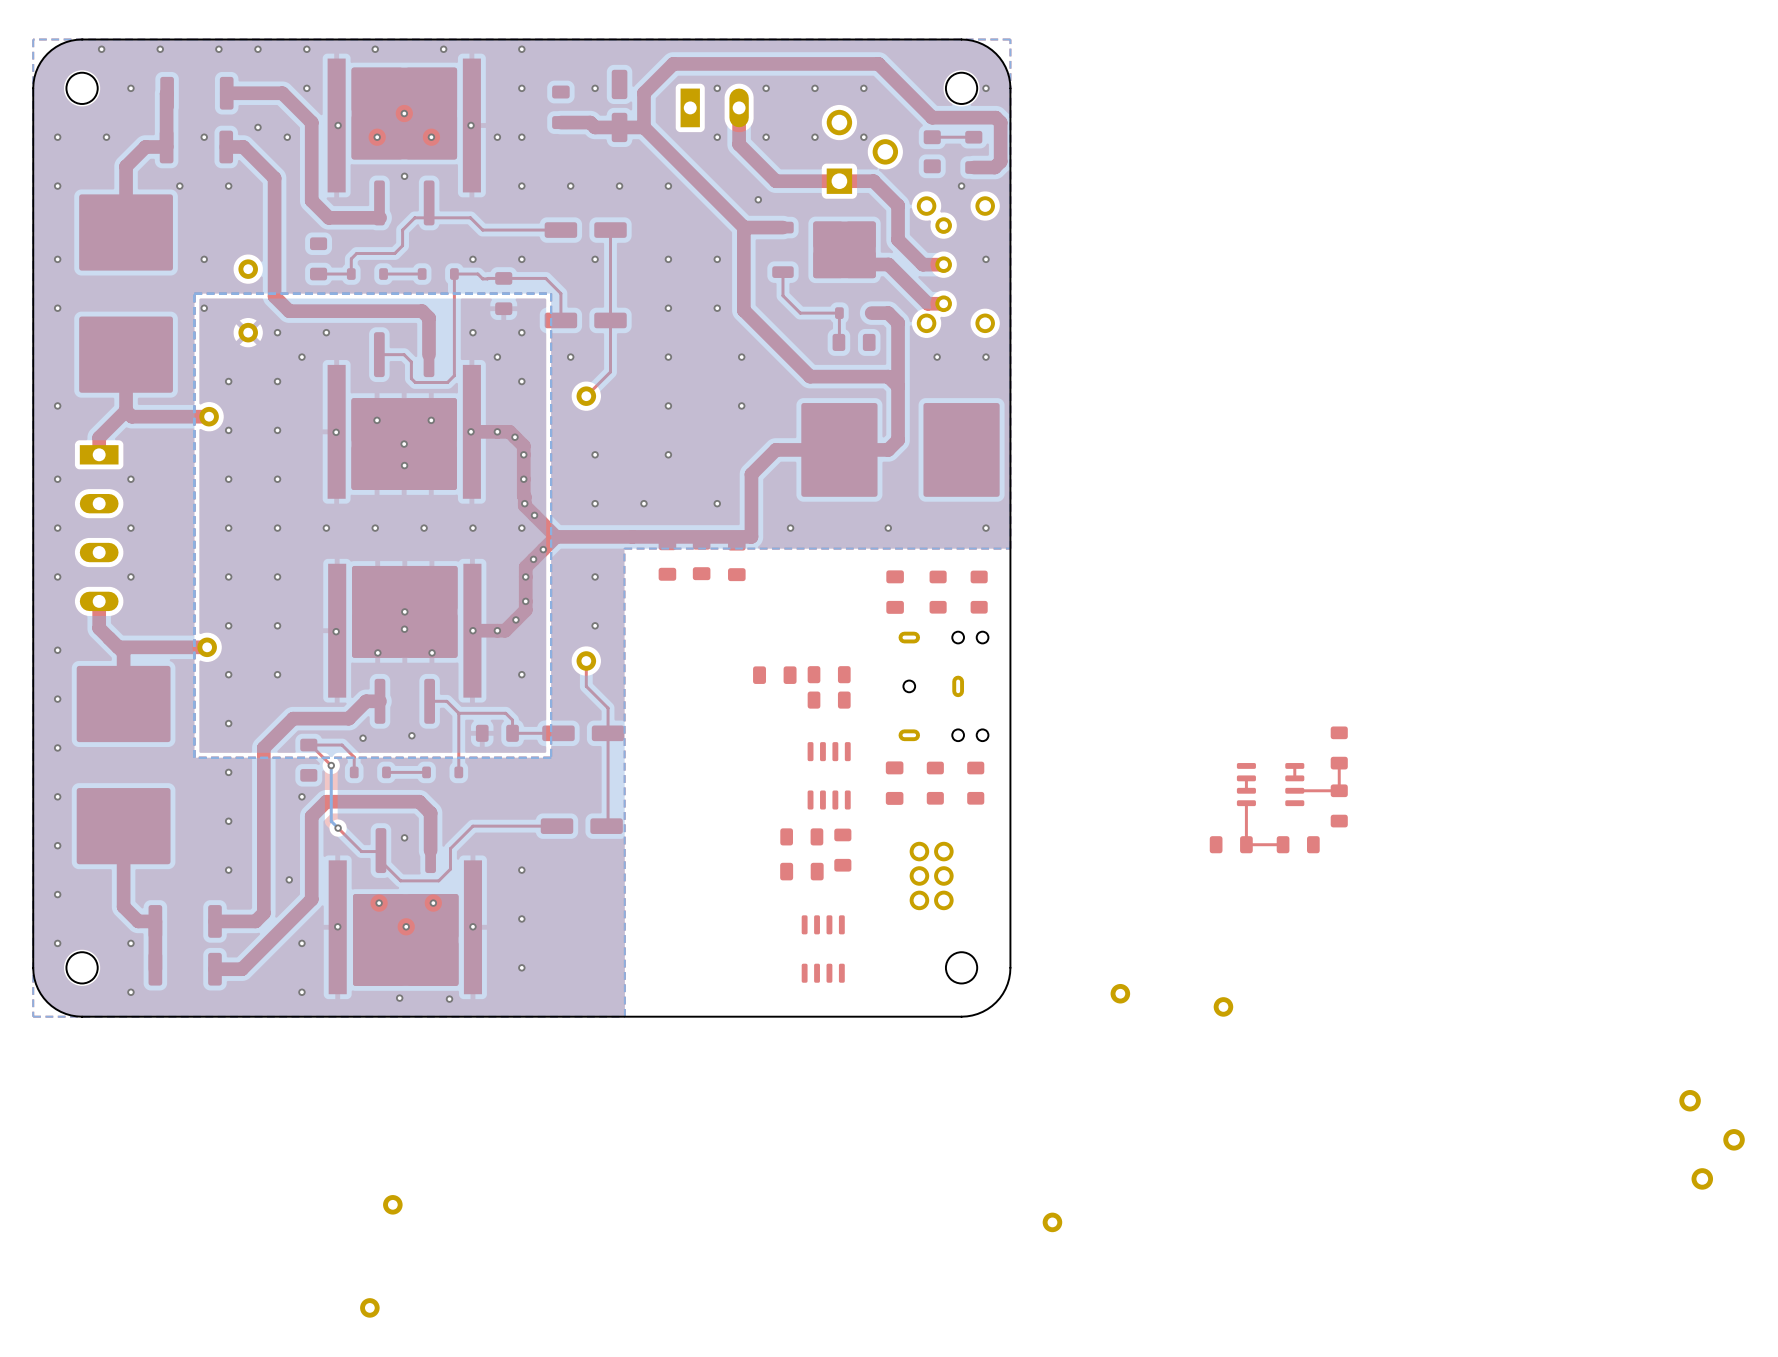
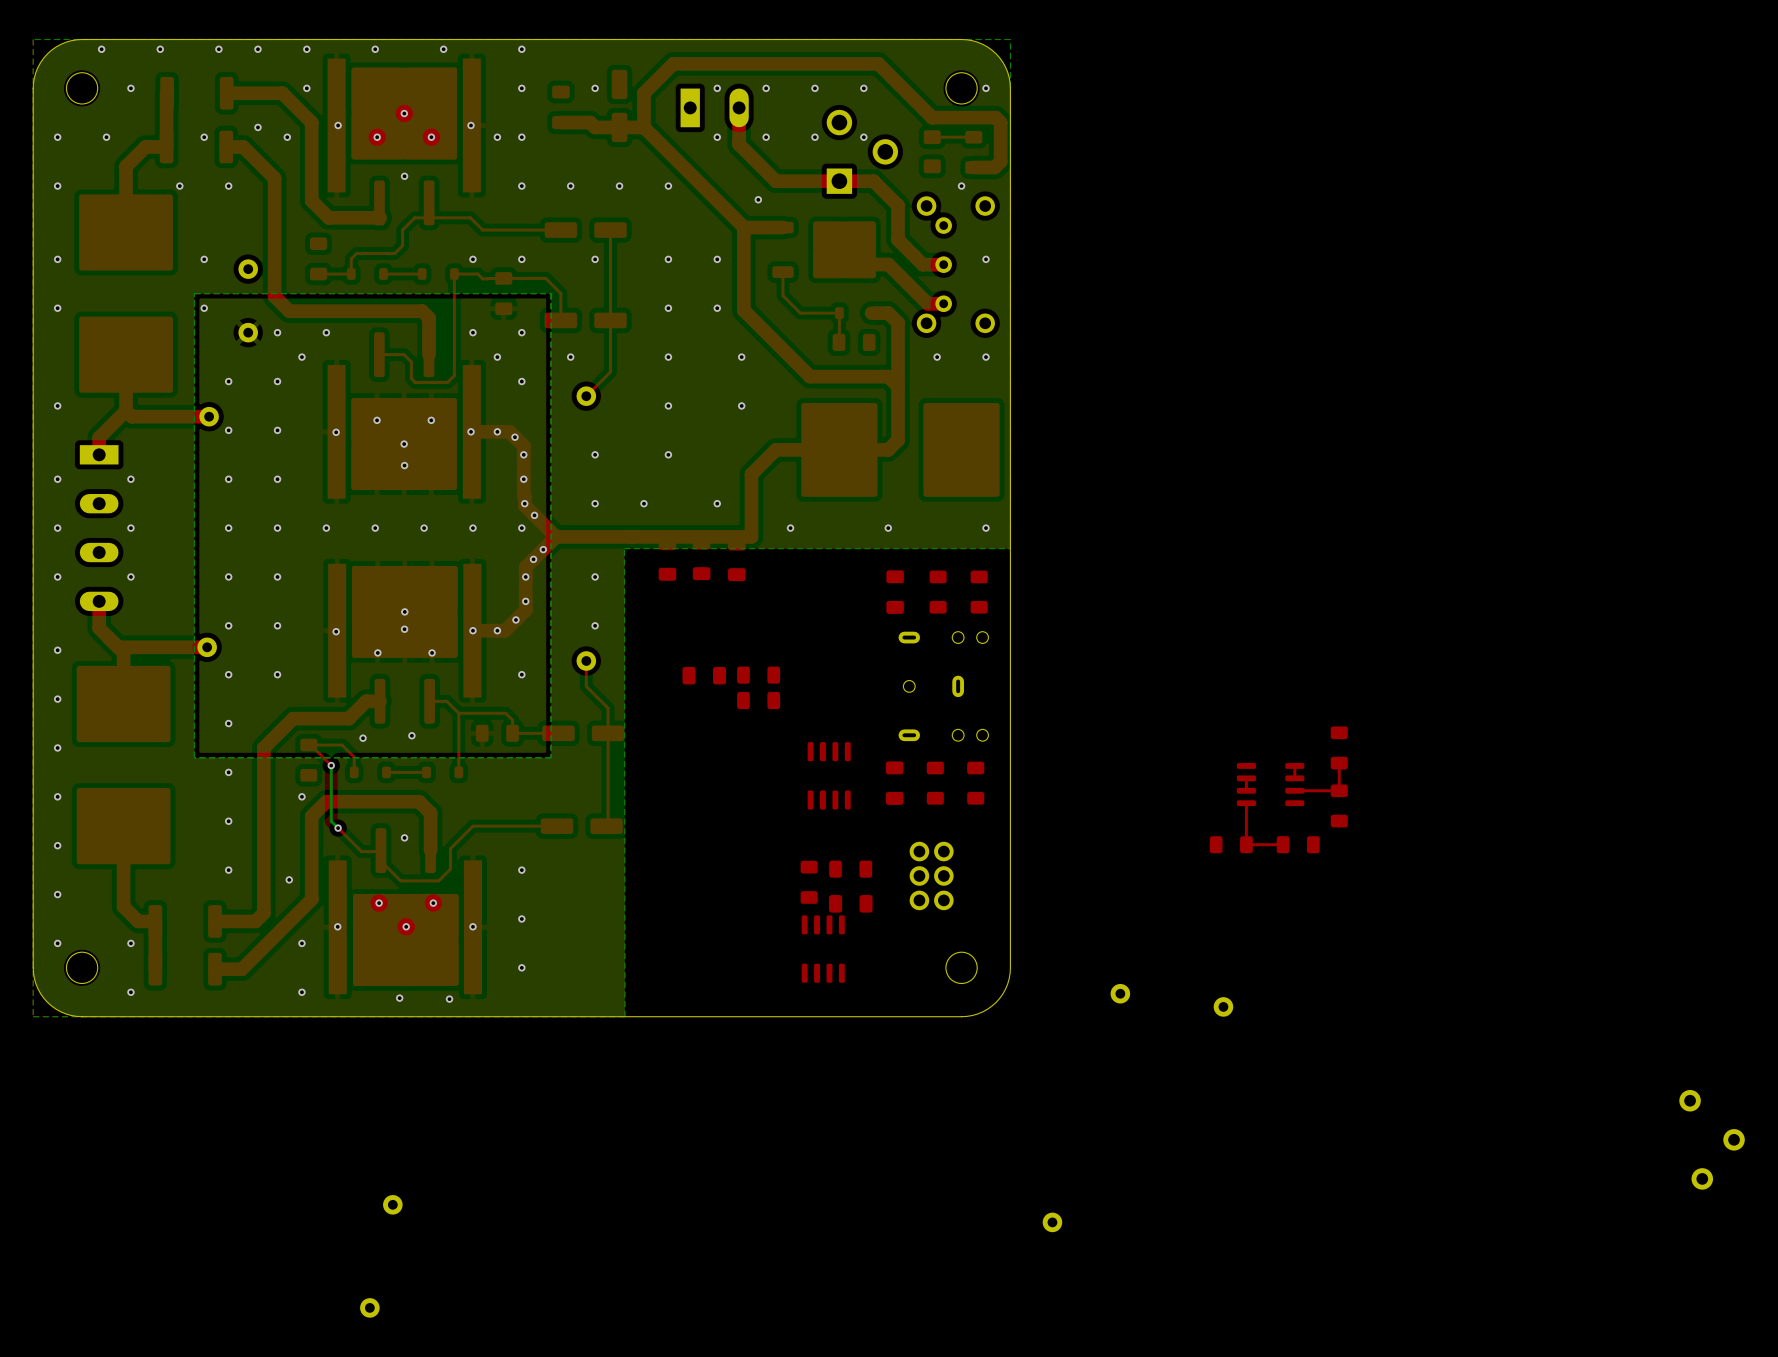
part: (829, 674) -> none
part: none -> (758, 675)
part position: (774, 675) -> (704, 675)
part: none -> (758, 700)
part: (829, 700) -> none
part: (801, 836) -> none
part rotation: 0° (842, 850) -> 90° clockwise (850, 869)
part position: (801, 871) -> (850, 903)
part: none -> (809, 882)

